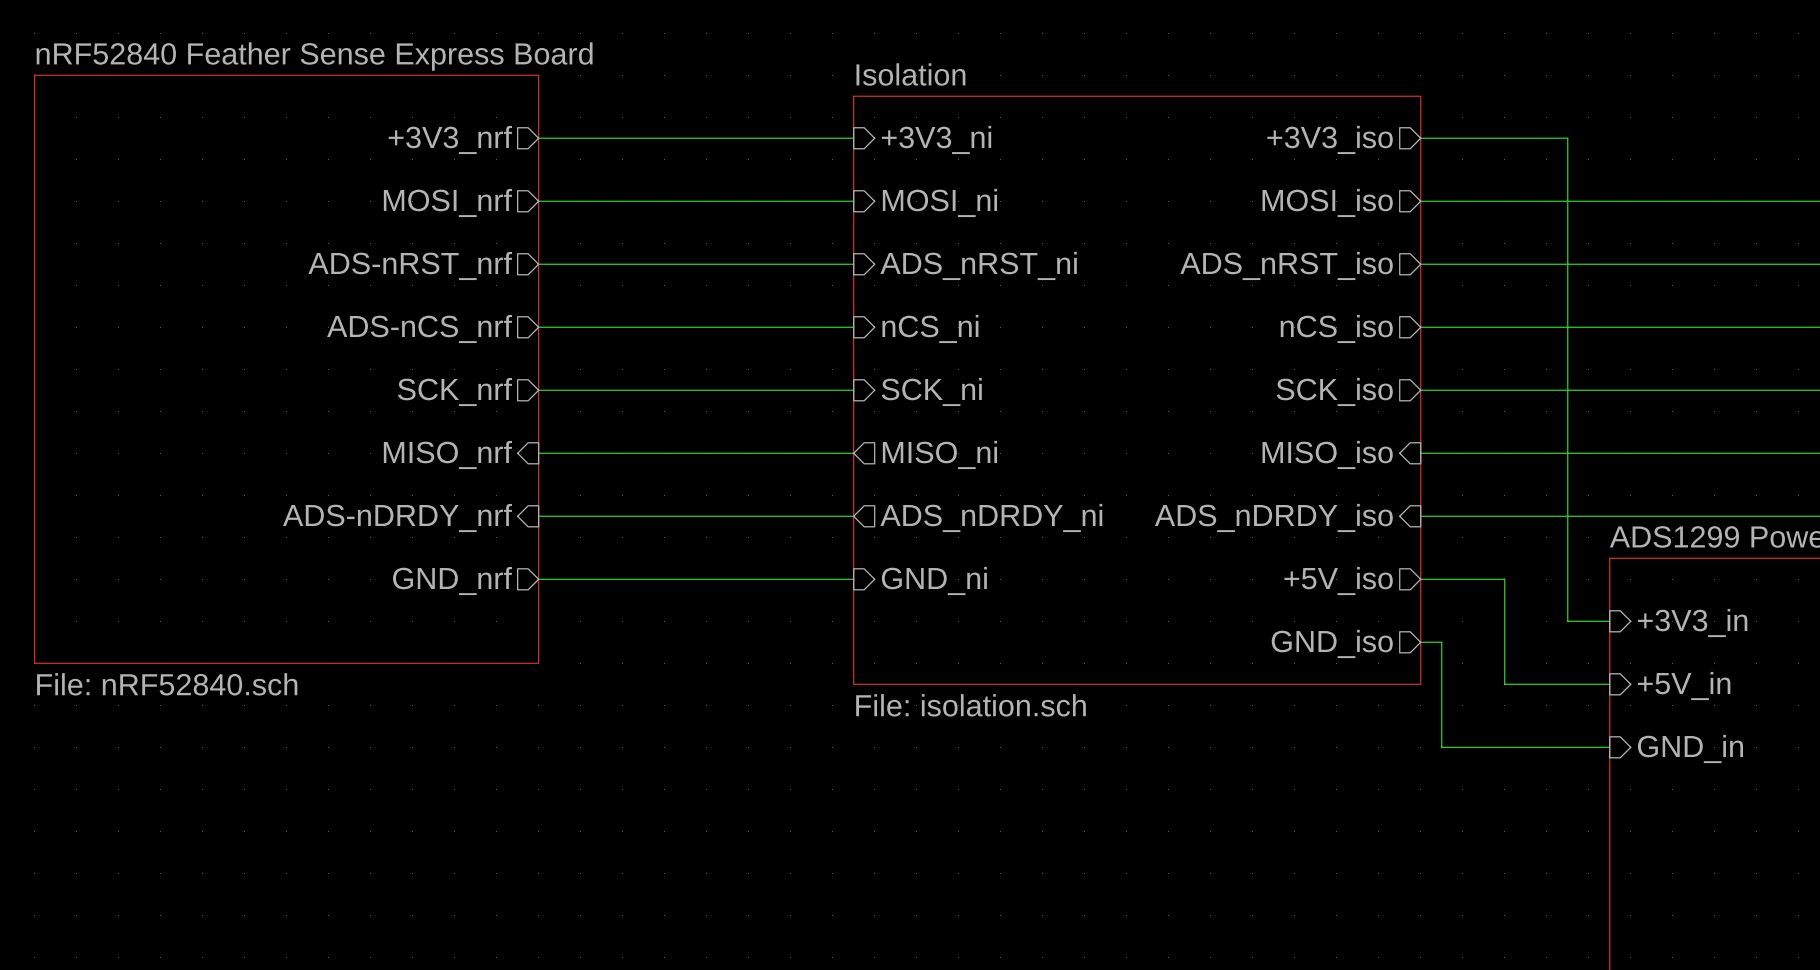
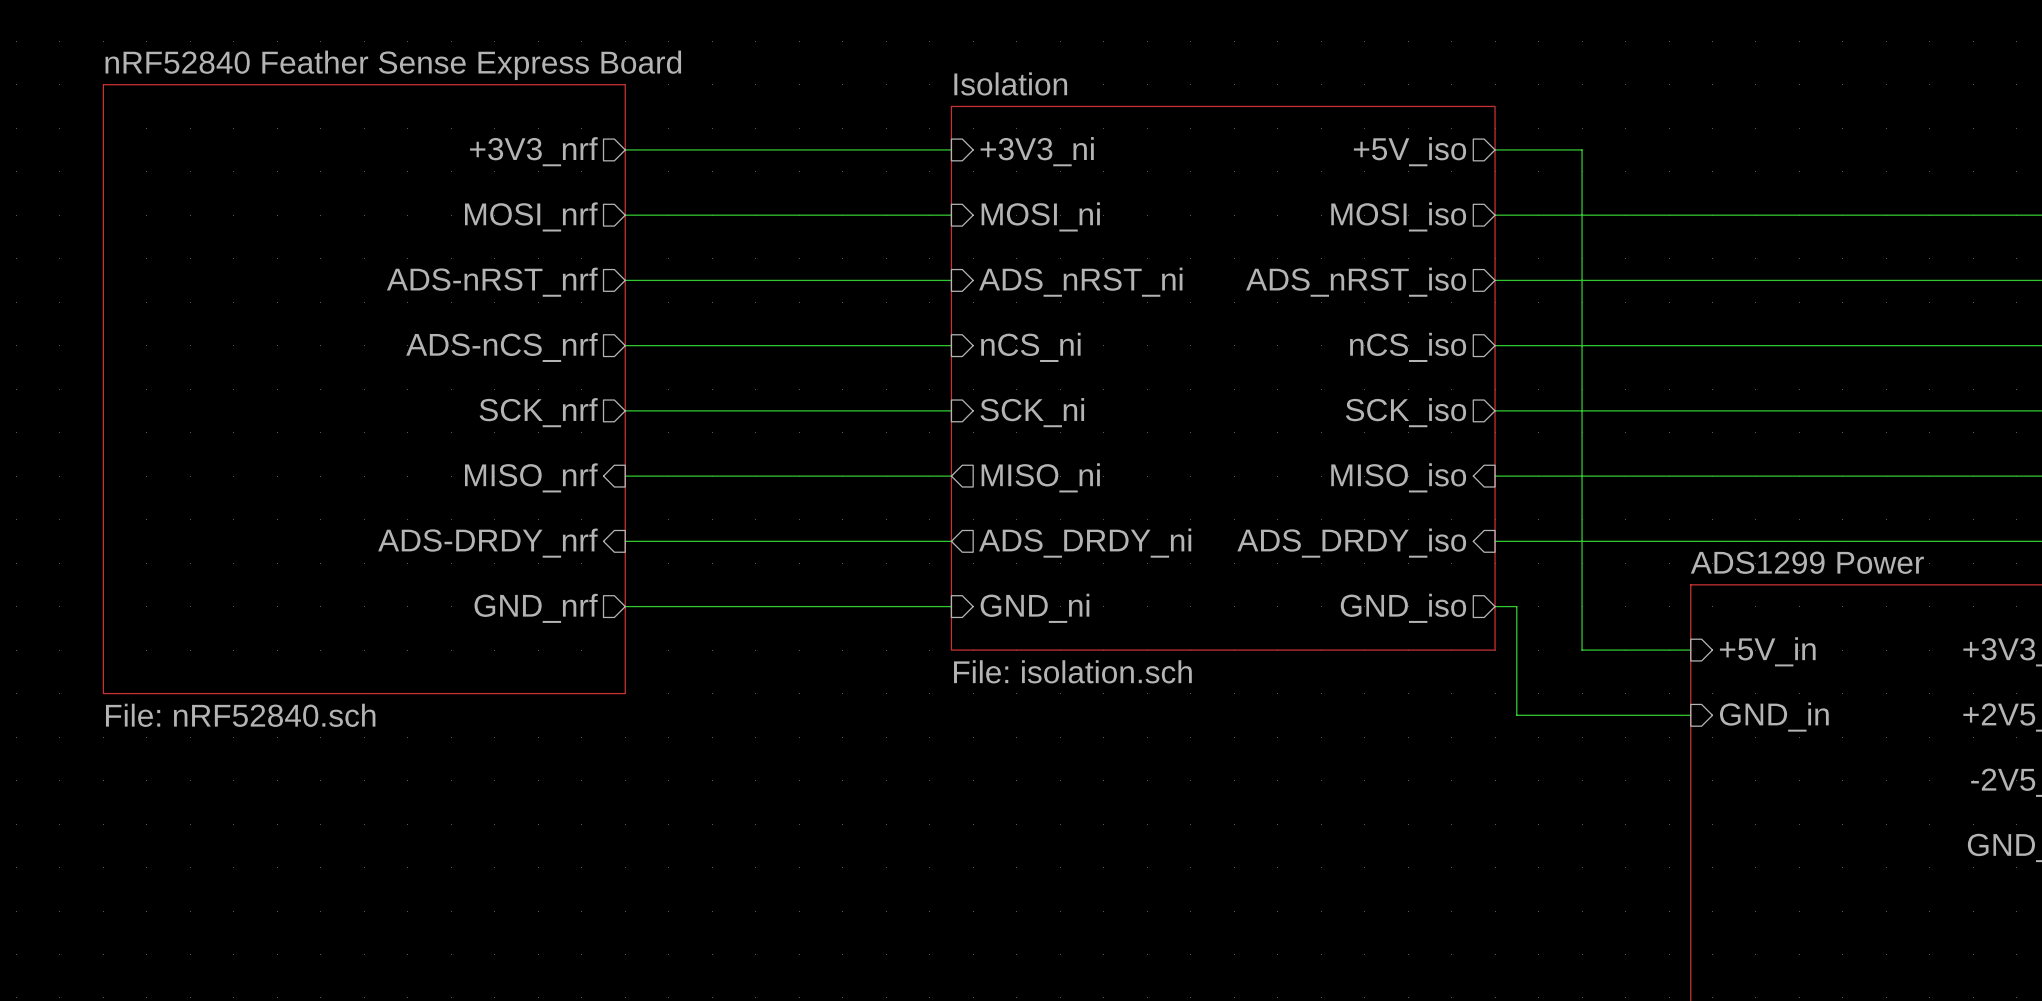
wire: (538, 138) (580, 138) -> (907, 149) (951, 149)
wire: (1504, 138) (1567, 138) (1567, 621) -> (1582, 149) (1582, 606)
sheet pin position: +3V3_nrf (450, 139) -> +3V3_nrf (533, 151)
sheet pin position: +3V3_ni (936, 139) -> +3V3_ni (1037, 151)
sheet pin: +3V3_iso (1330, 139) -> +5V_iso (1409, 151)
wire: (538, 201) (580, 201) -> (907, 215) (951, 215)
sheet pin position: MOSI_nrf (447, 202) -> MOSI_nrf (531, 216)
sheet pin position: MOSI_ni (939, 202) -> MOSI_ni (1040, 216)
wire: (538, 264) (580, 264) -> (907, 280) (951, 280)
sheet pin position: ADS-nRST_nrf (410, 265) -> ADS-nRST_nrf (492, 282)
sheet pin position: ADS_nRST_ni (978, 265) -> ADS_nRST_ni (1080, 282)
wire: (538, 327) (580, 327) -> (907, 345) (951, 345)
sheet pin position: ADS-nCS_nrf (419, 328) -> ADS-nCS_nrf (501, 347)
sheet pin position: nCS_ni (930, 328) -> nCS_ni (1030, 347)
sheet Isolation: none -> File: isolation.sch (1223, 378)
sheet nRF52840 Feather Sense Express Board position: (286, 369) -> (364, 389)
wire: (538, 390) (580, 390) -> (907, 410) (951, 410)
sheet Isolation: File: isolation.sch (1137, 390) -> none
sheet pin position: SCK_nrf (454, 391) -> SCK_nrf (538, 412)
sheet pin position: SCK_ni (931, 391) -> SCK_ni (1032, 412)
wire: (538, 453) (580, 453) -> (907, 476) (951, 476)
sheet pin position: MISO_nrf (447, 454) -> MISO_nrf (531, 477)
sheet pin position: MISO_ni (939, 454) -> MISO_ni (1040, 477)
wire: (538, 516) (580, 516) -> (907, 541) (951, 541)
sheet pin: ADS_nDRDY_ni (991, 517) -> ADS_DRDY_ni (1085, 543)
sheet pin: ADS_nDRDY_iso (1273, 517) -> ADS_DRDY_iso (1351, 543)
sheet pin: ADS-nDRDY_nrf (397, 518) -> ADS-DRDY_nrf (487, 543)
wire: (538, 579) (580, 579) -> (907, 606) (951, 606)
wire: (1441, 579) (1504, 579) -> none
sheet pin position: GND_ni (934, 580) -> GND_ni (1034, 608)
sheet pin: +5V_iso (1338, 580) -> GND_iso (1403, 608)
sheet pin position: GND_nrf (452, 581) -> GND_nrf (536, 608)
wire: (1504, 621) (1504, 684) -> (1582, 650) (1647, 650)
sheet pin: +3V3_in (1692, 622) -> +5V_in (1767, 651)
wire: (1420, 642) (1441, 642) -> (1516, 606) (1516, 671)
sheet pin: GND_iso (1332, 643) -> none
wire: (1441, 684) (1441, 747) (1609, 747) -> (1516, 715) (1582, 715)
sheet pin: +5V_in (1684, 686) -> GND_in (1774, 717)
sheet pin: GND_in (1690, 749) -> none

